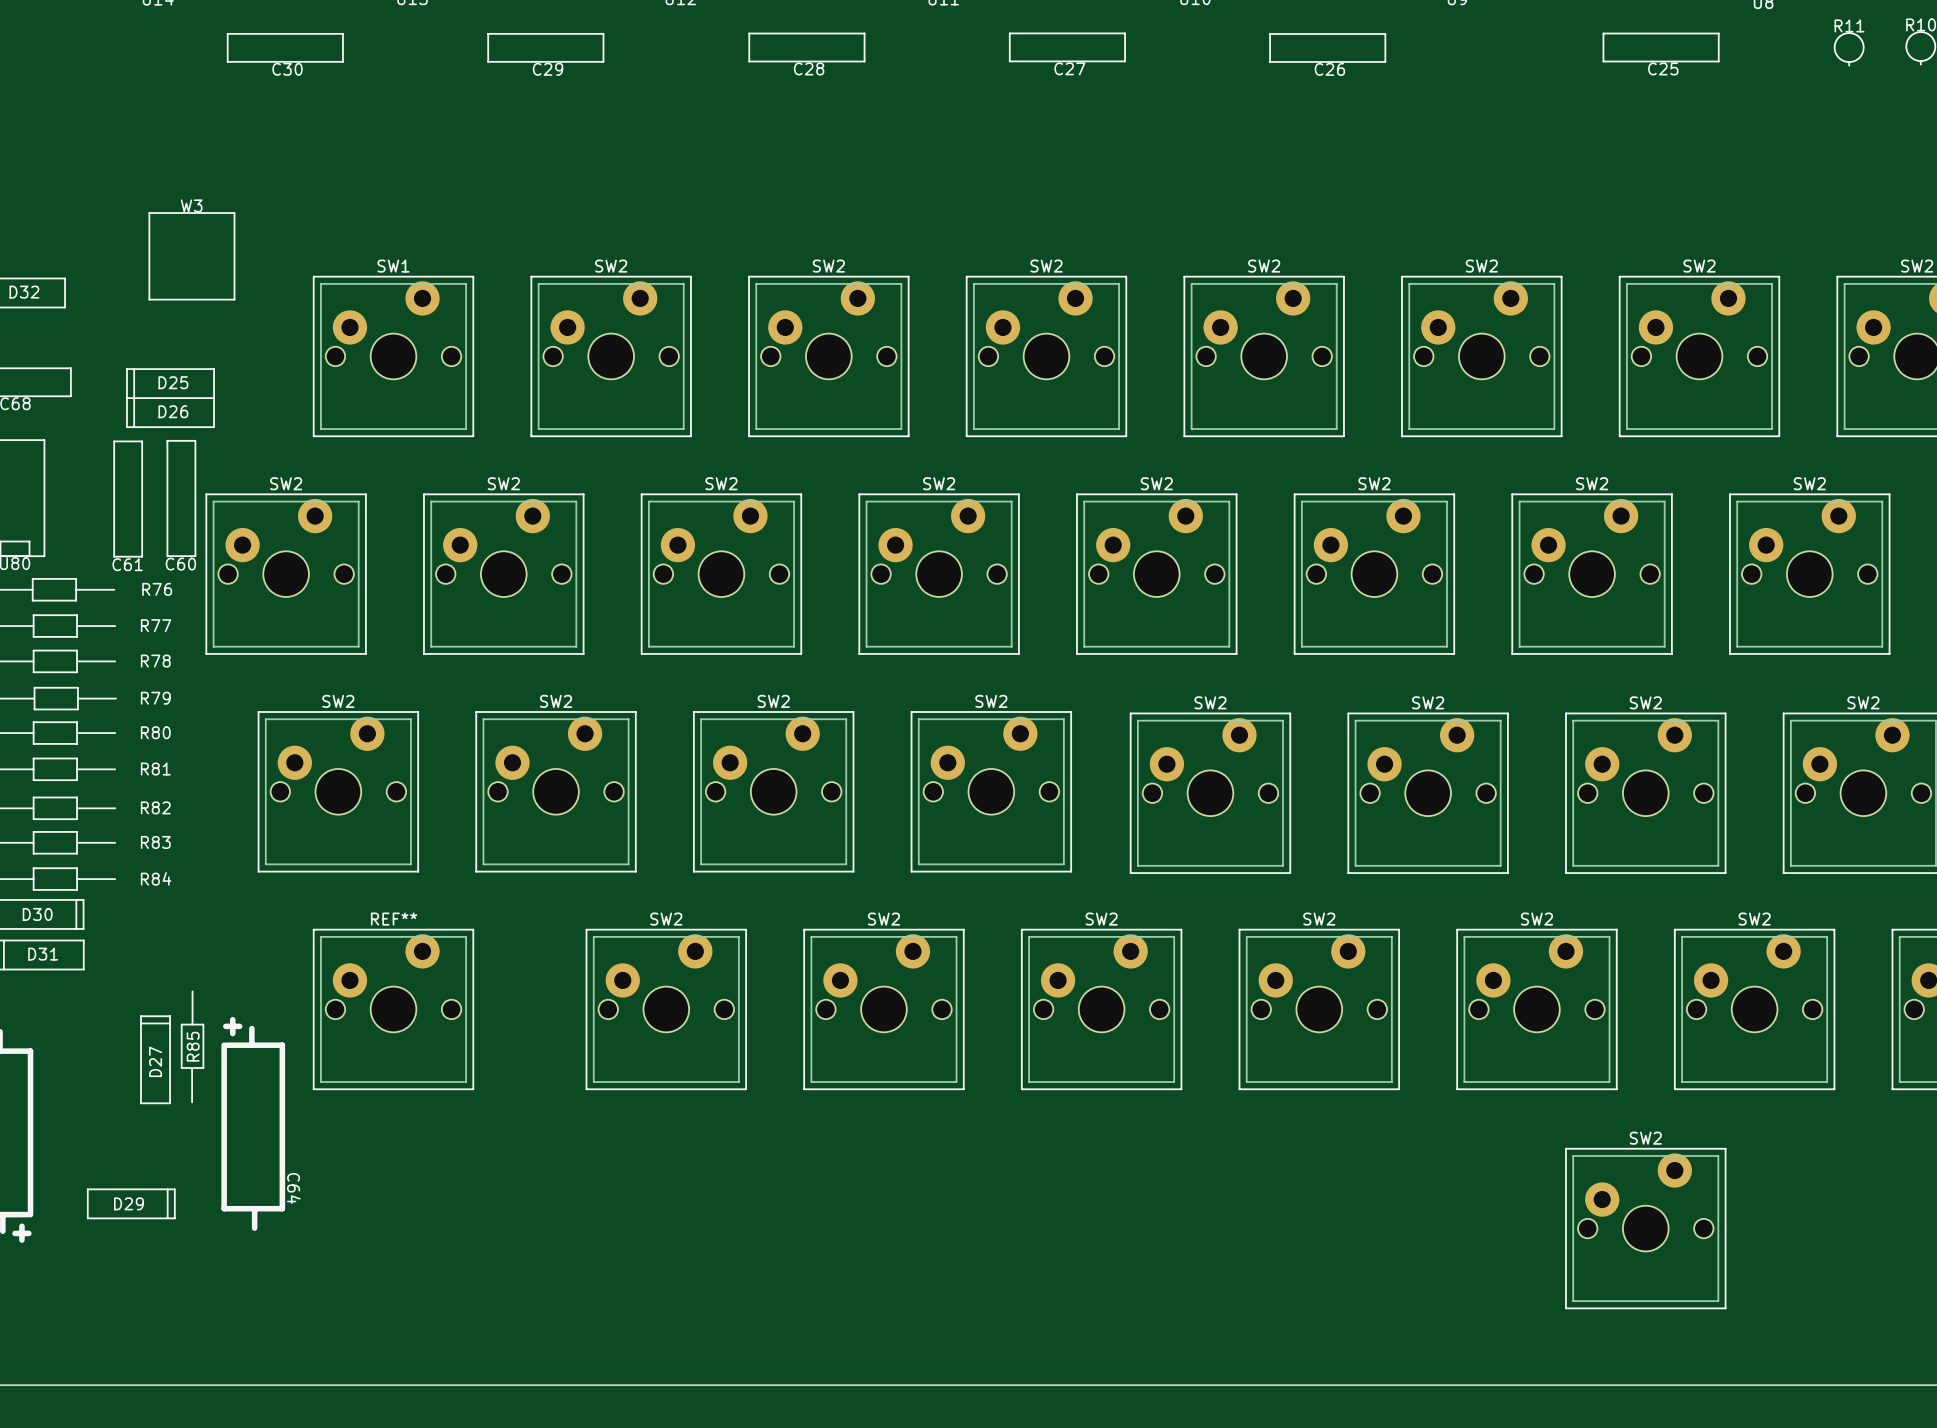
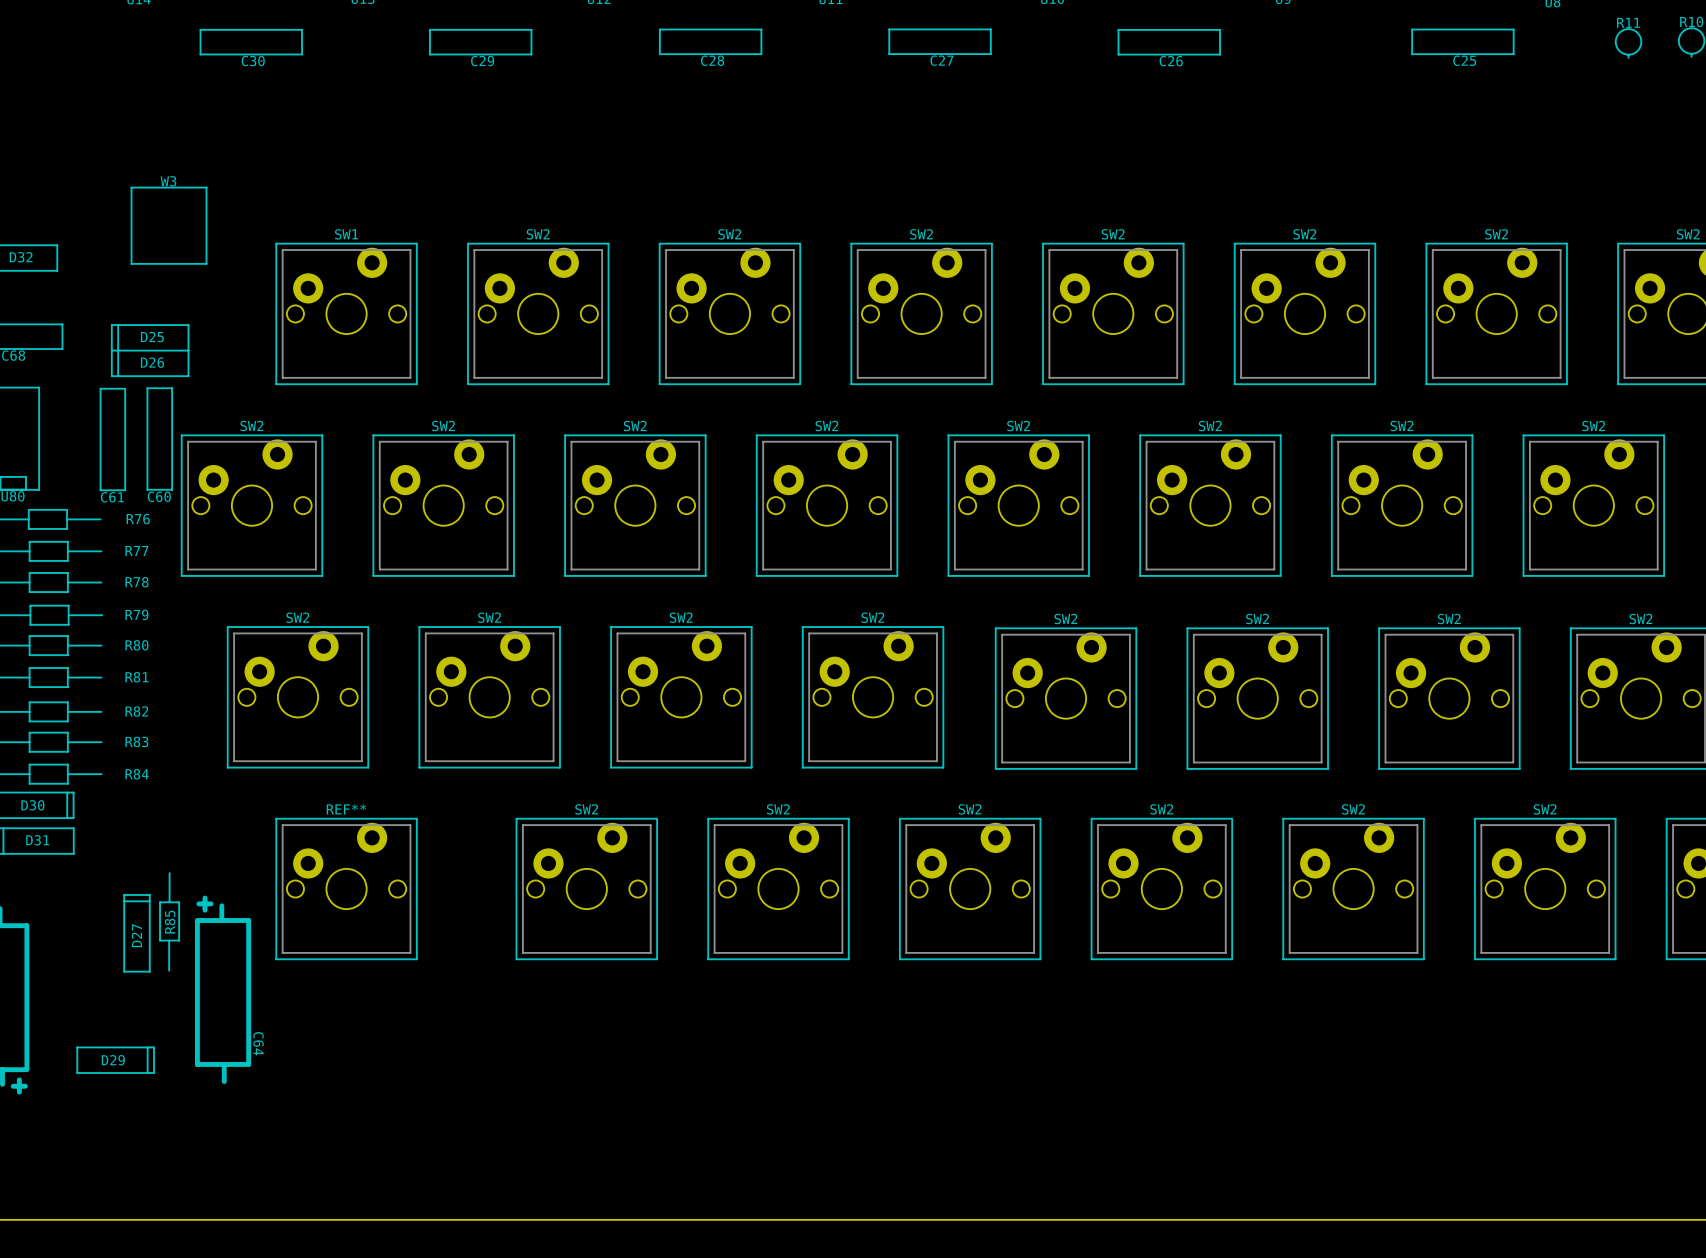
SW2: (1645, 1228) -> none

